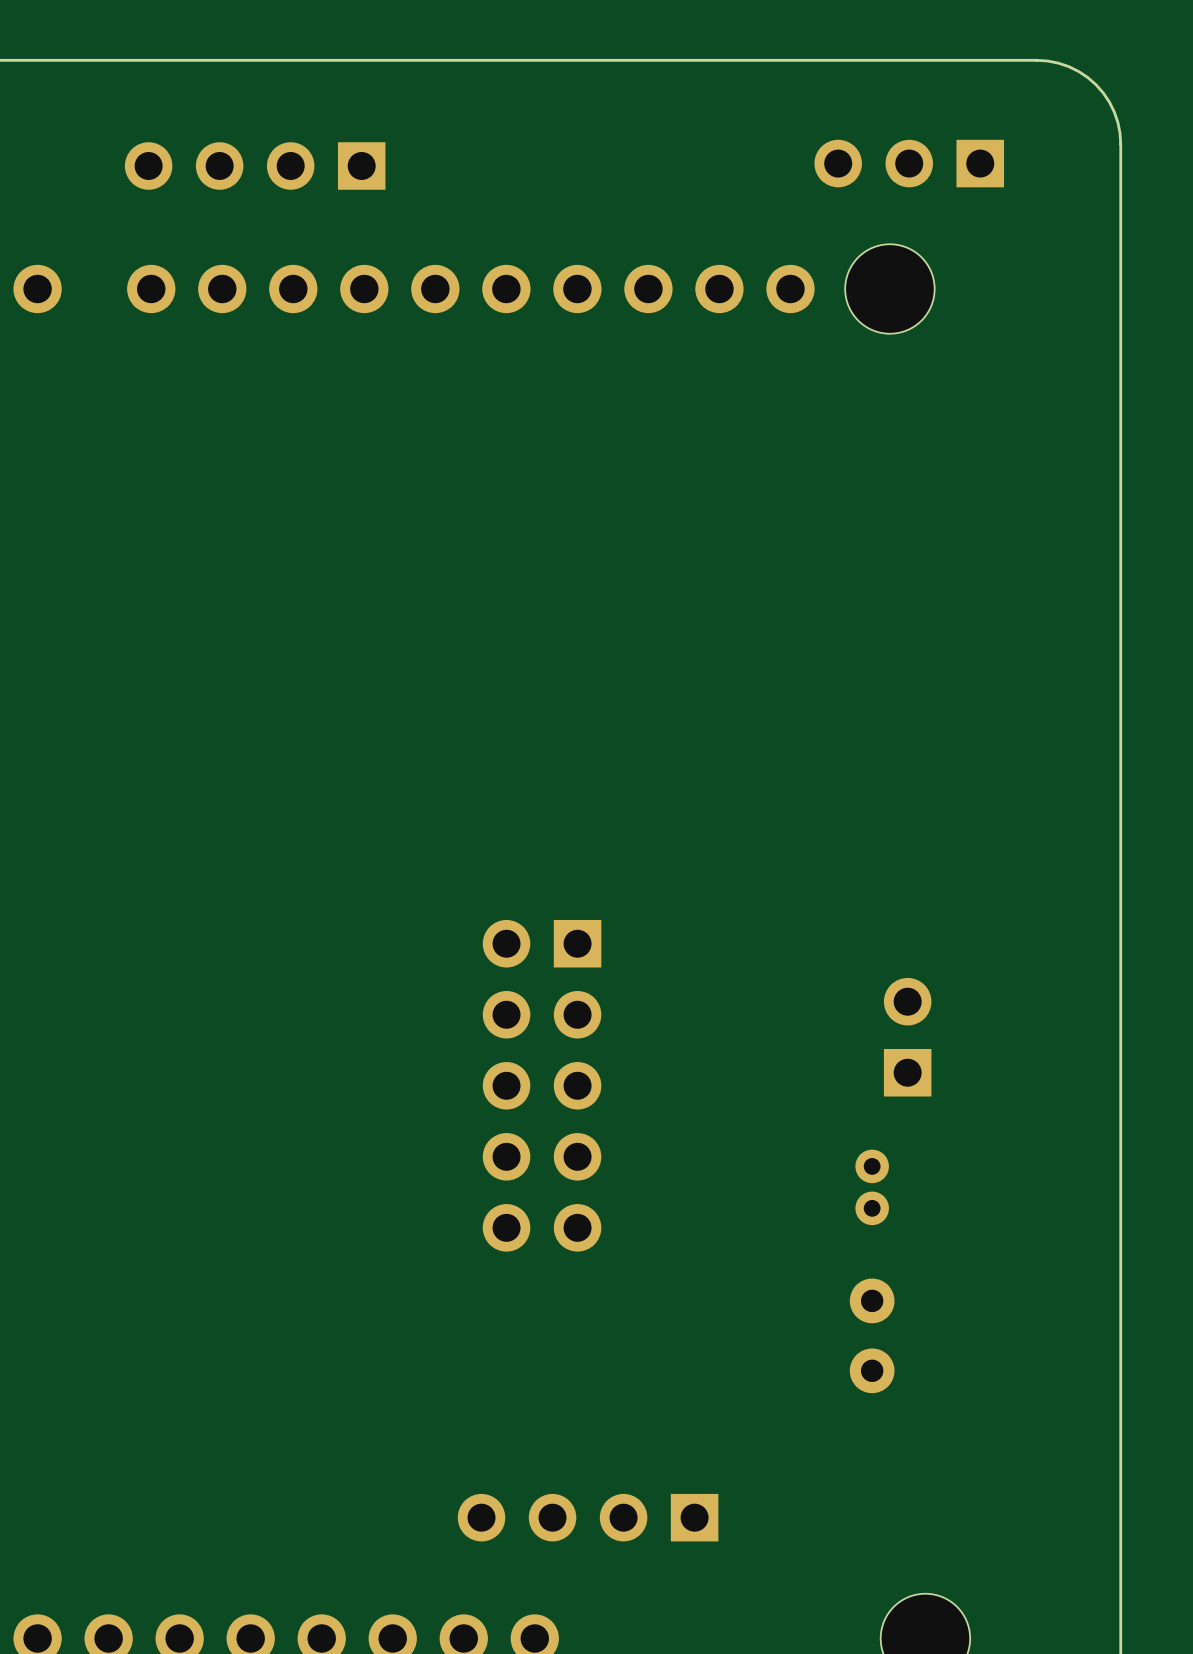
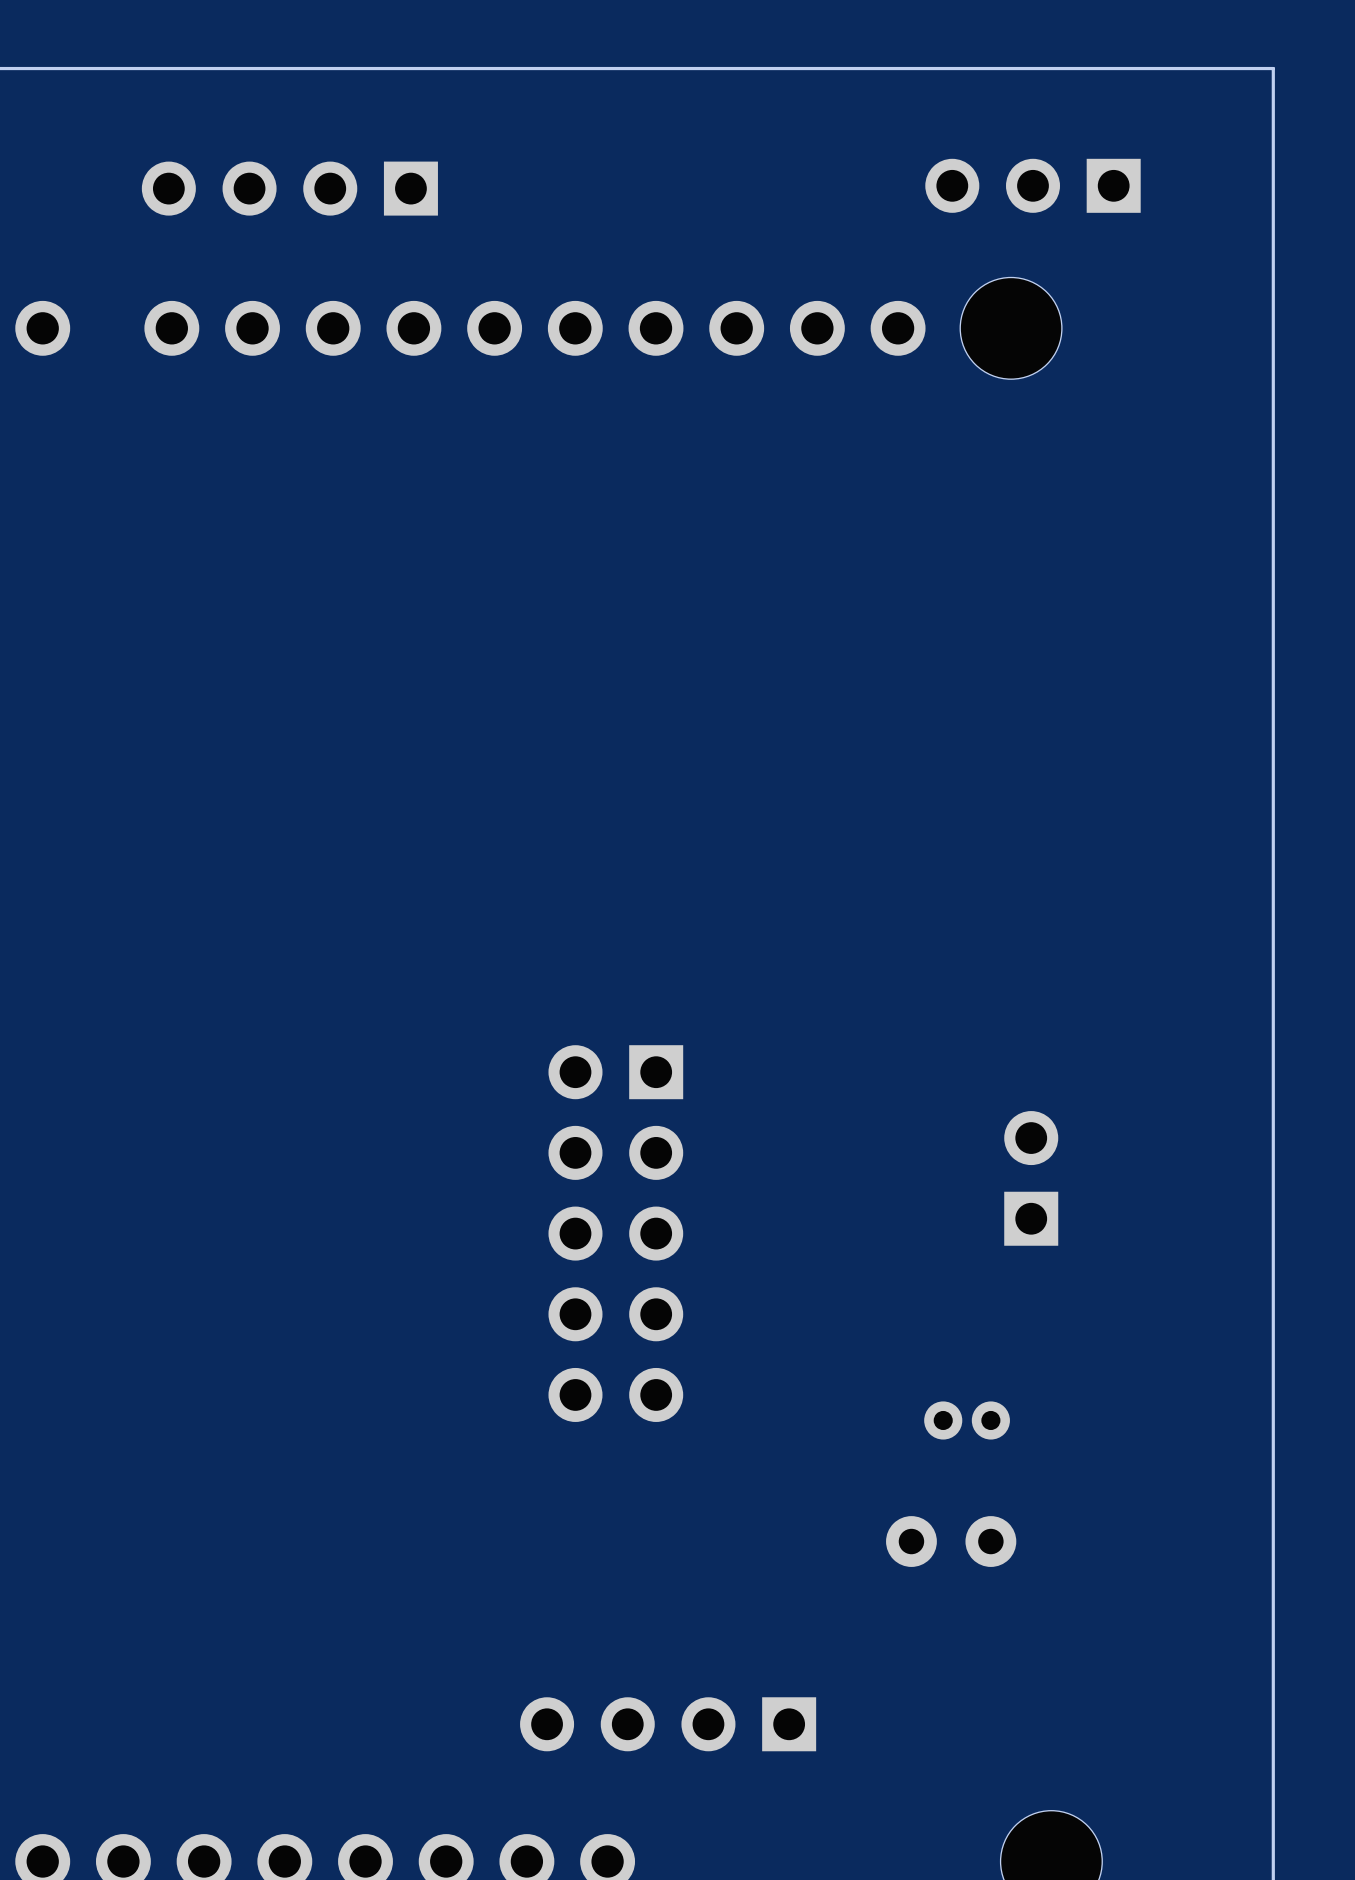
board edge: (1036, 60) (1068, 66) (1096, 84) (1114, 112) (1120, 144) -> (1178, 68) (1273, 68) (1273, 163)
part rotation: 0° (872, 1187) -> 90° clockwise (967, 1420)
part position: (872, 1187) -> (967, 1420)
part rotation: 0° (872, 1335) -> 90° clockwise (951, 1541)

